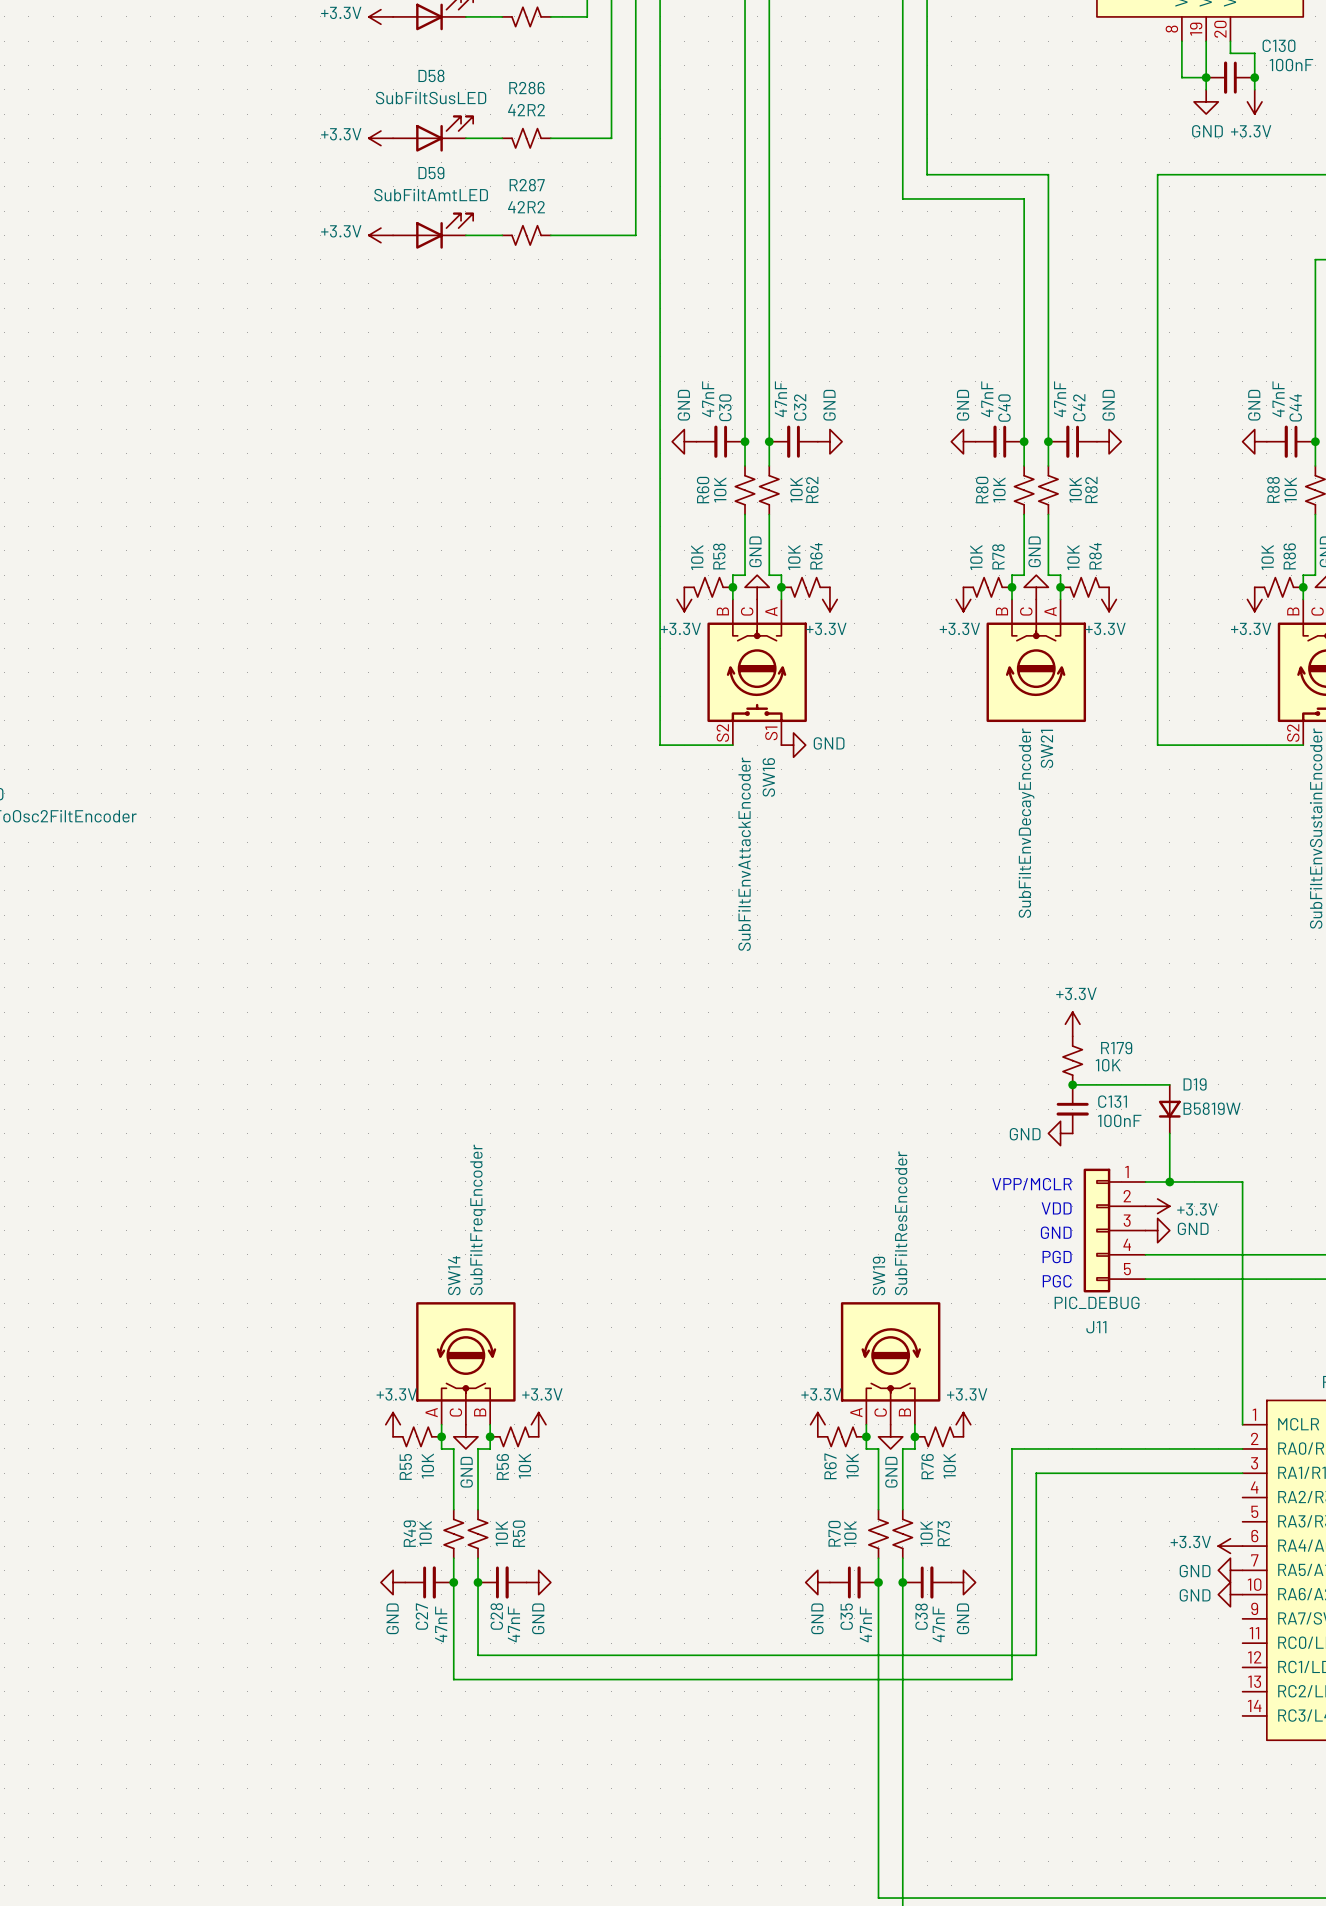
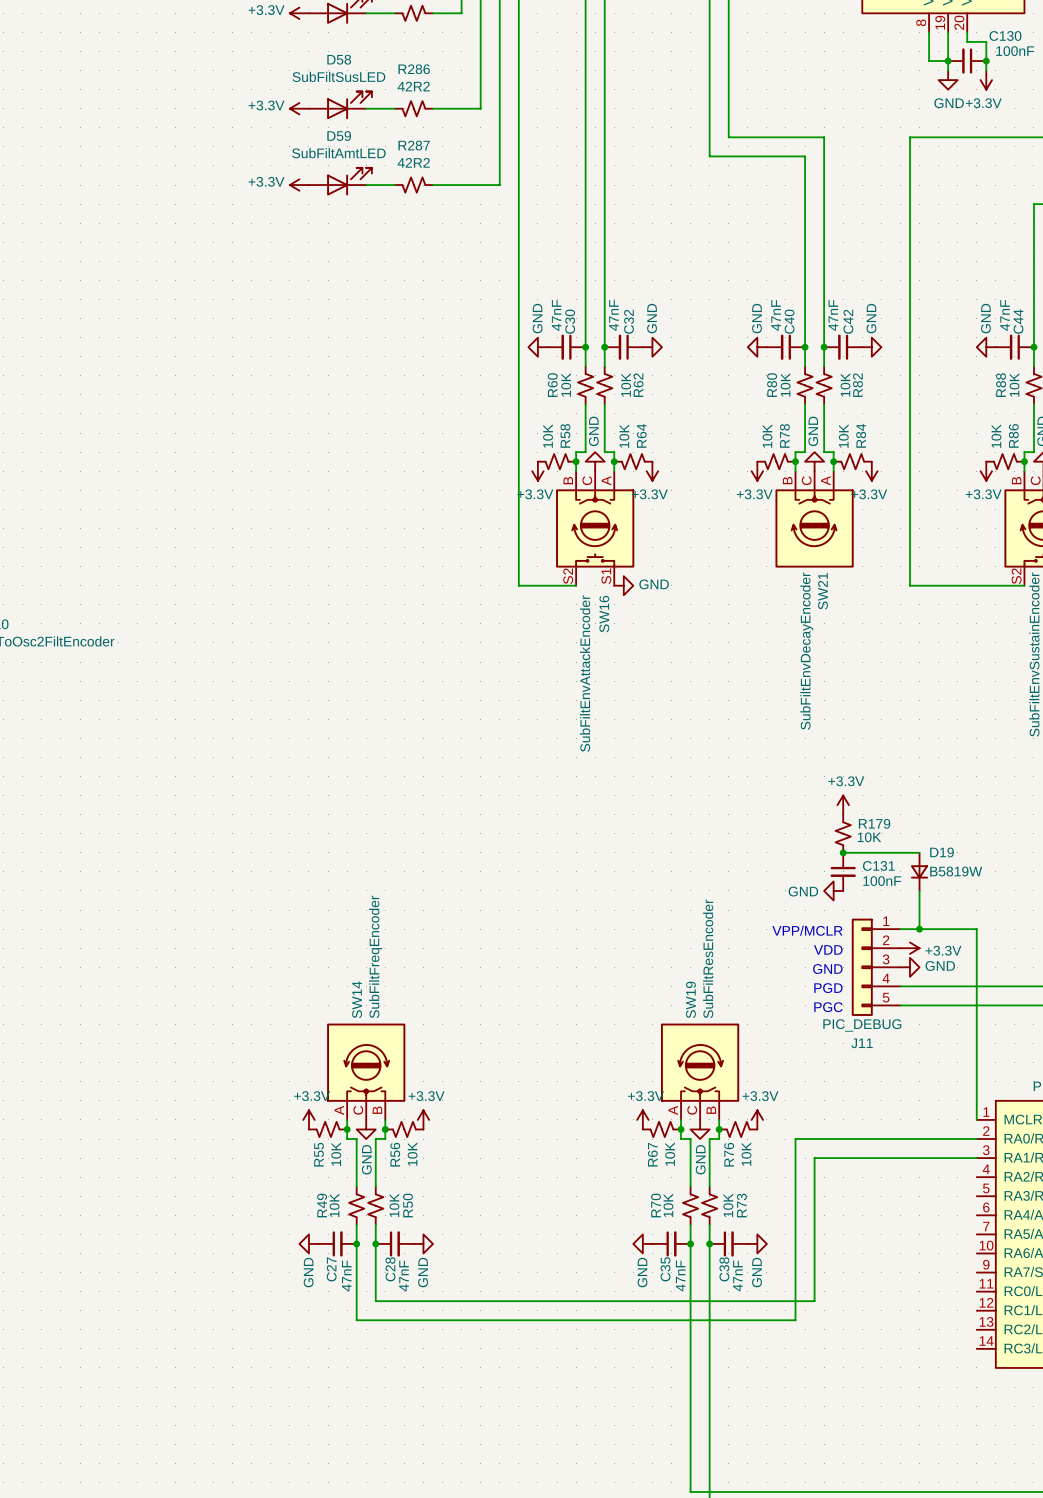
power symbol: +3.3V (1230, 1546) -> none
power symbol: GND (1230, 1570) -> none
power symbol: GND (1230, 1594) -> none

